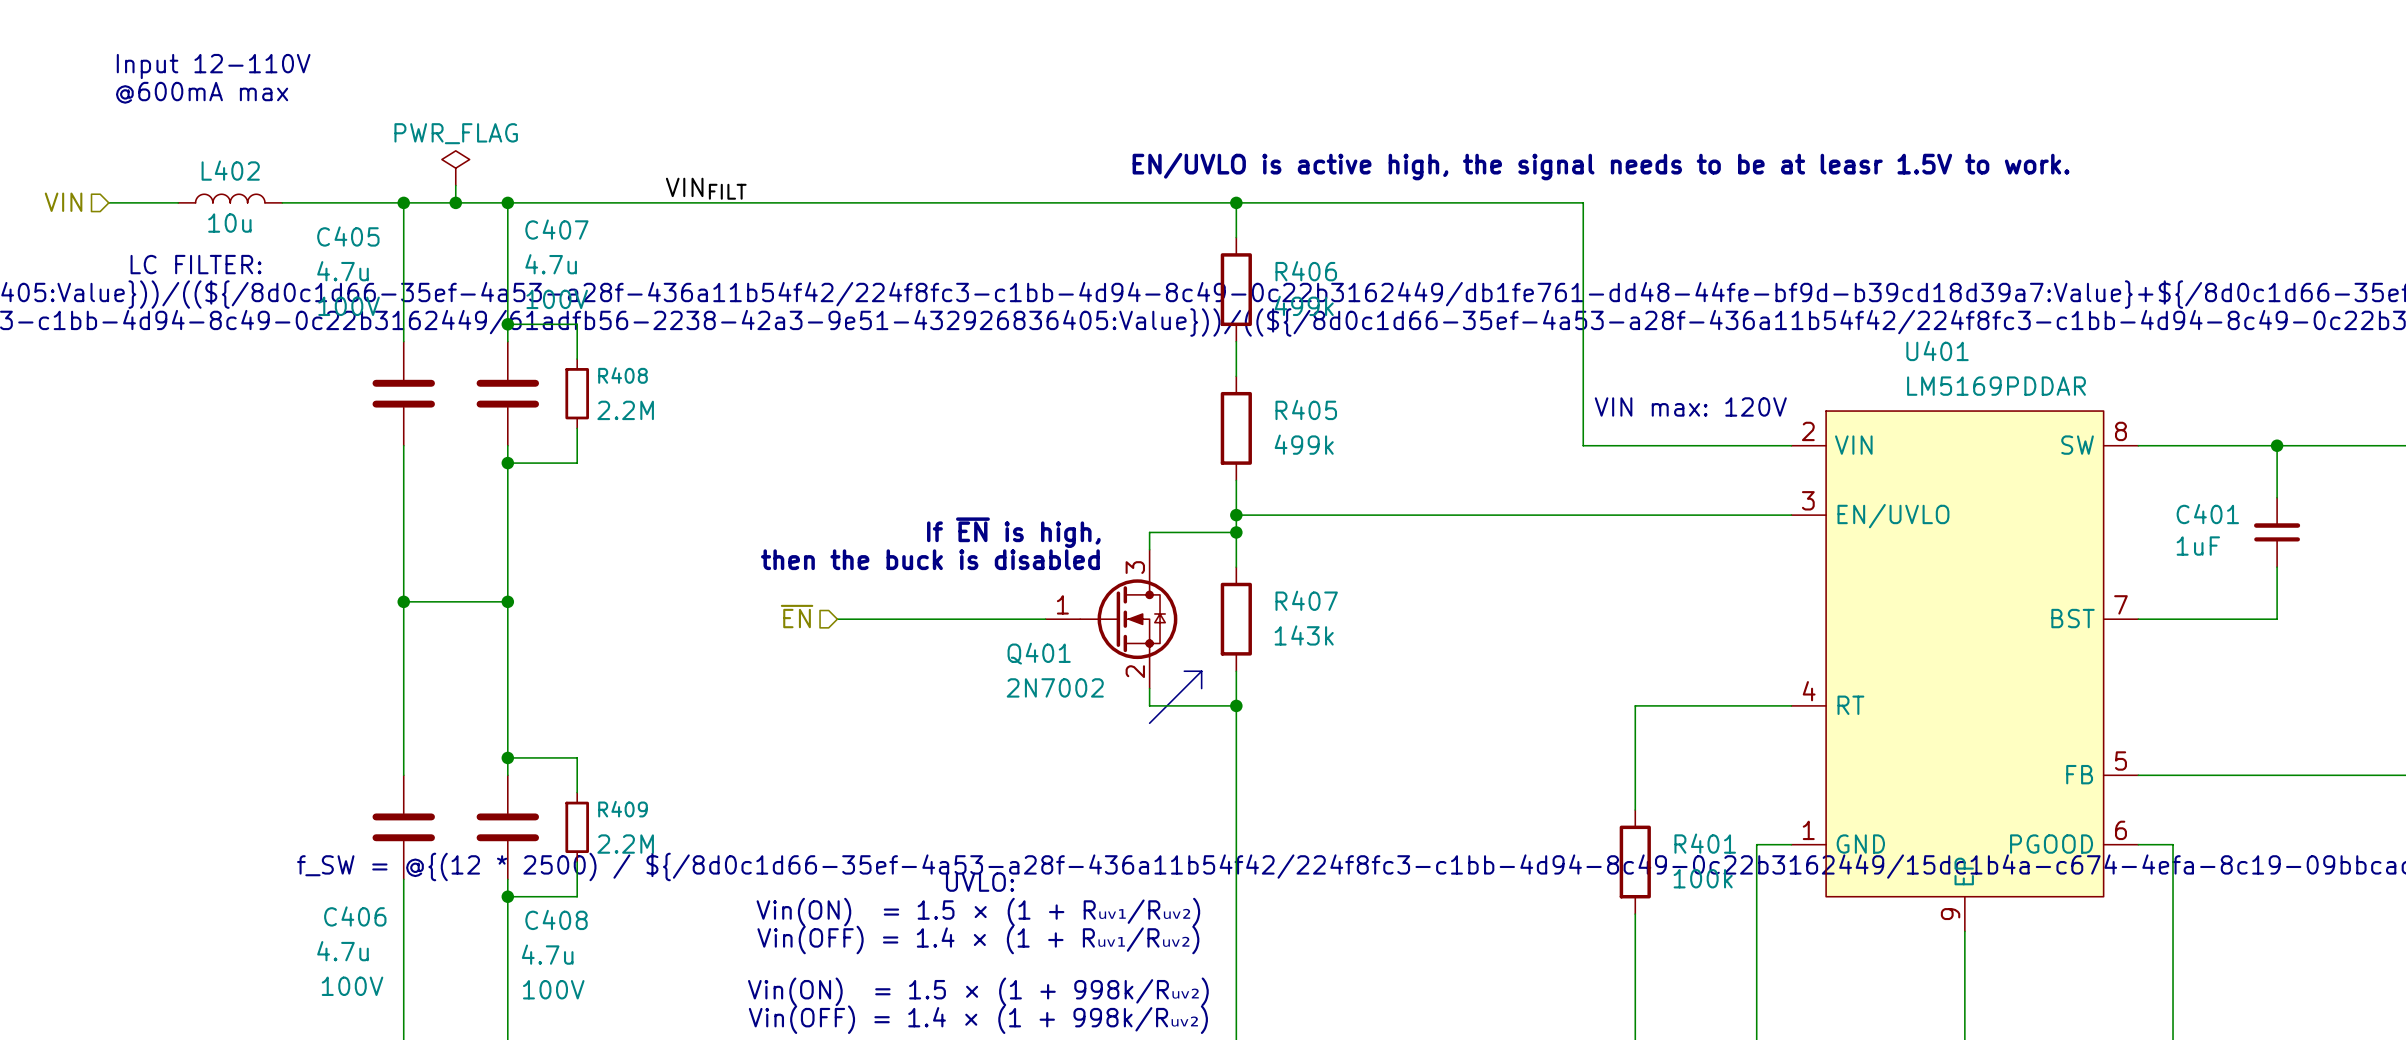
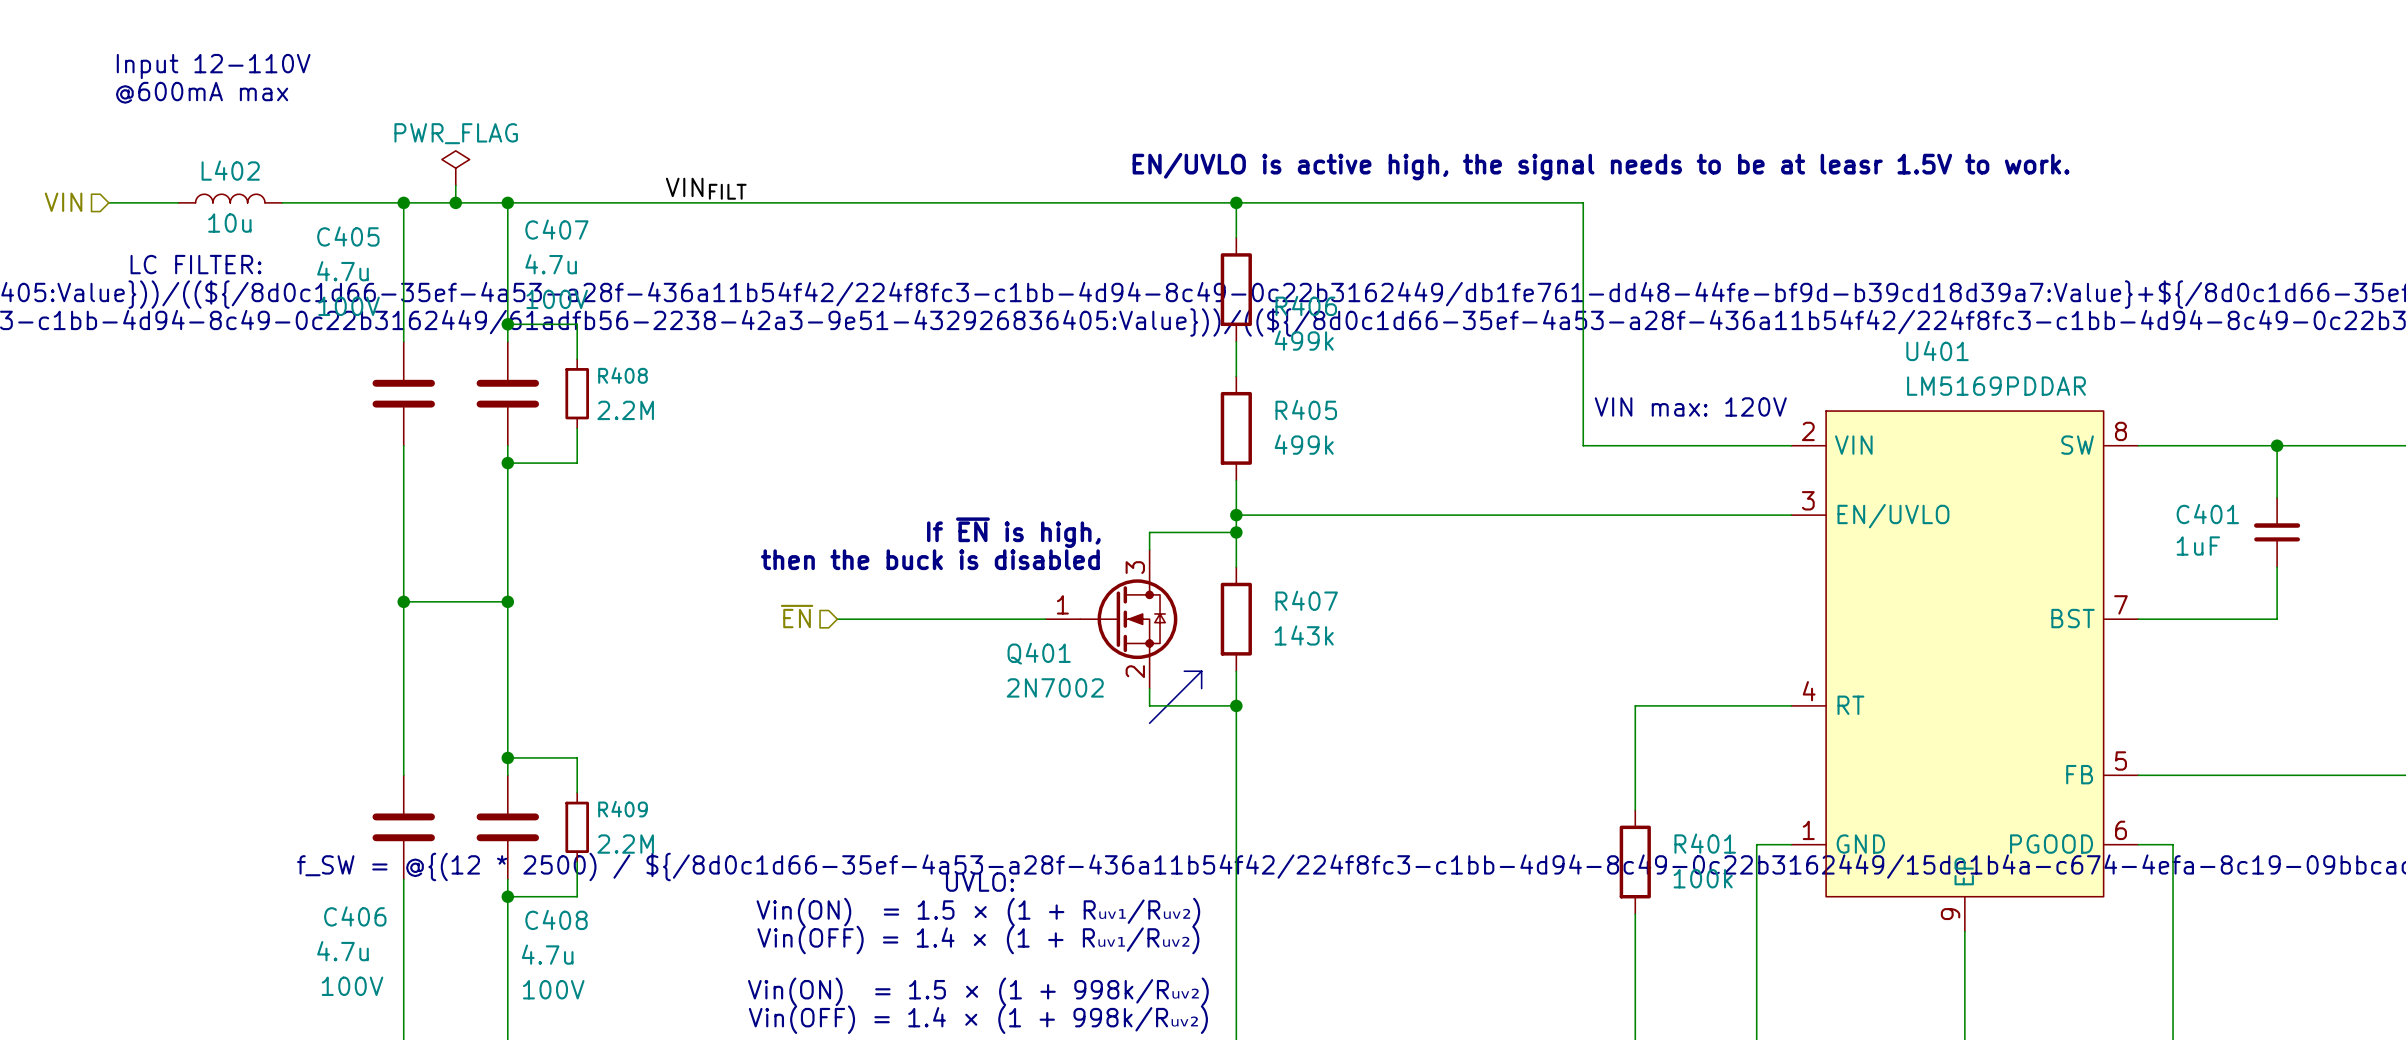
R406 name position: R406 (1306, 271) -> R406 (1306, 305)
R406 value position: 499k (1304, 305) -> 499k (1304, 340)

